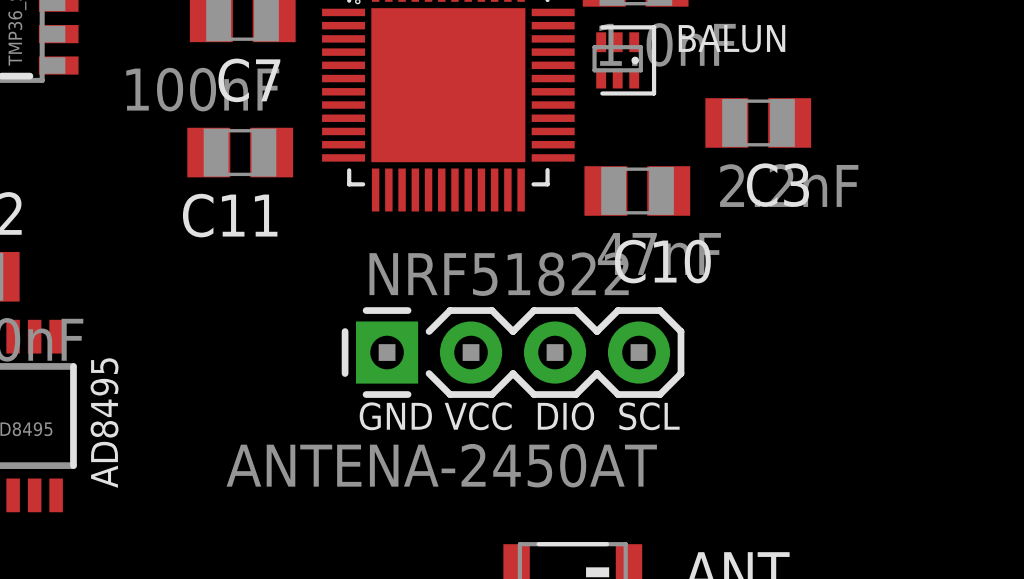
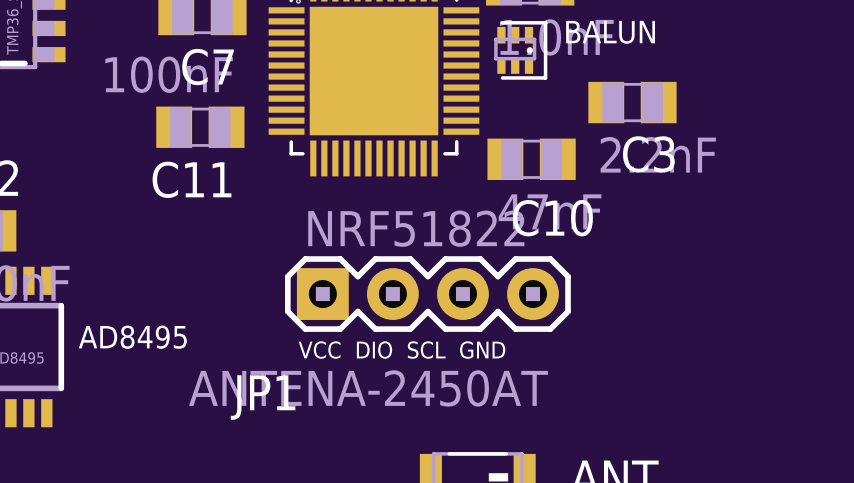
part: (513, 352) -> none
JP1: none -> (427, 294)
text: GND VCC DIO SCL (519, 416) -> VCC DIO SCL GND (401, 350)
AD8495 name rotation: 0° (104, 423) -> 90° clockwise (132, 337)

